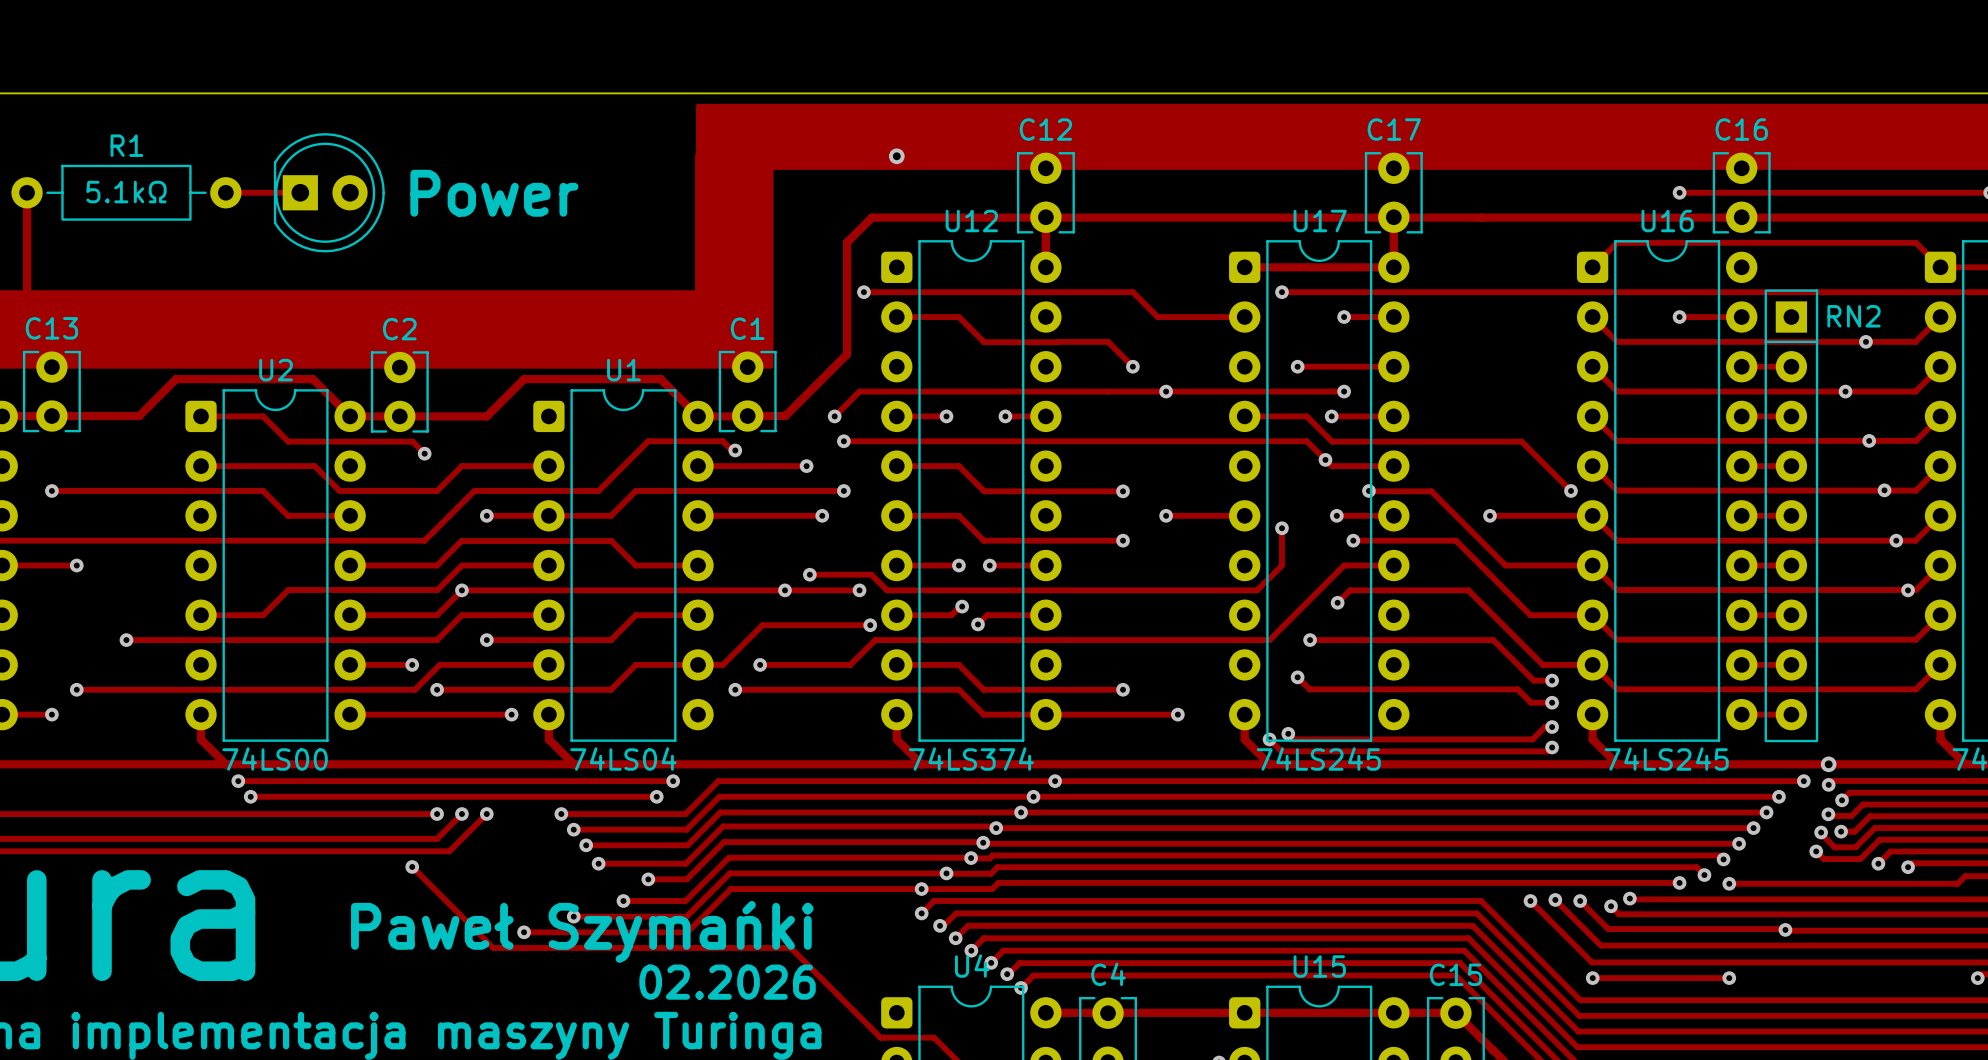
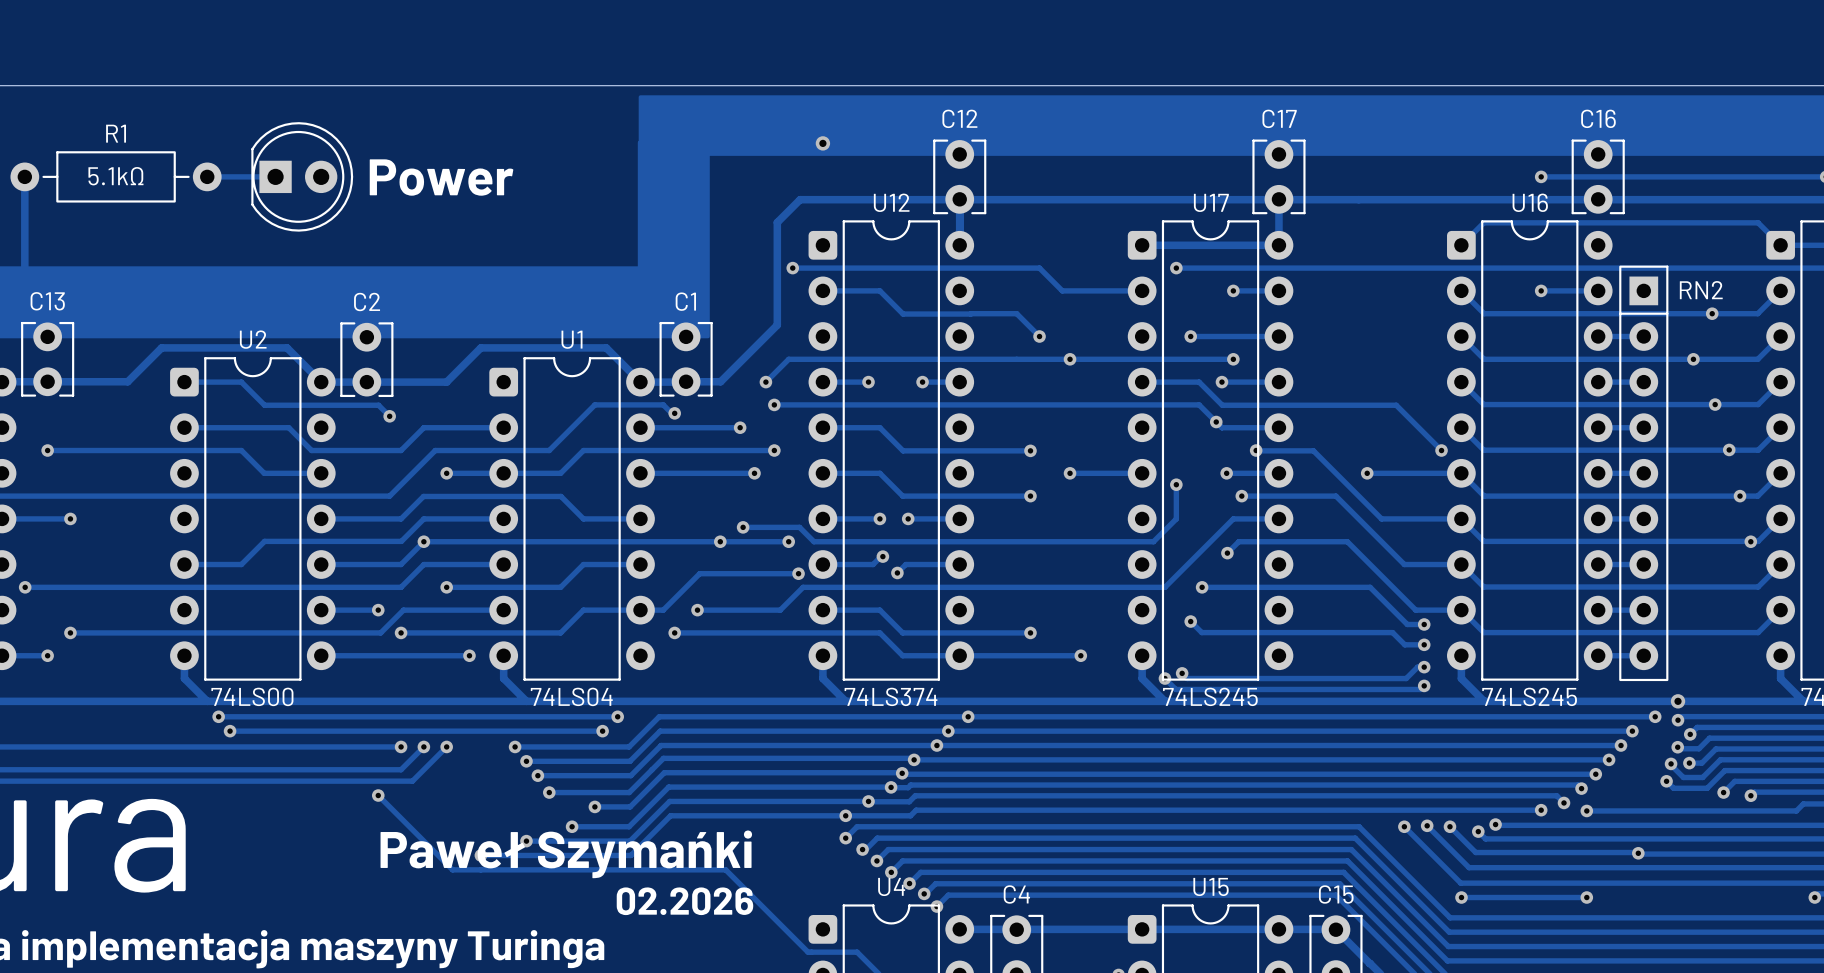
track: none -> (25, 587) (116, 587)
via position: (126, 640) -> (25, 587)

